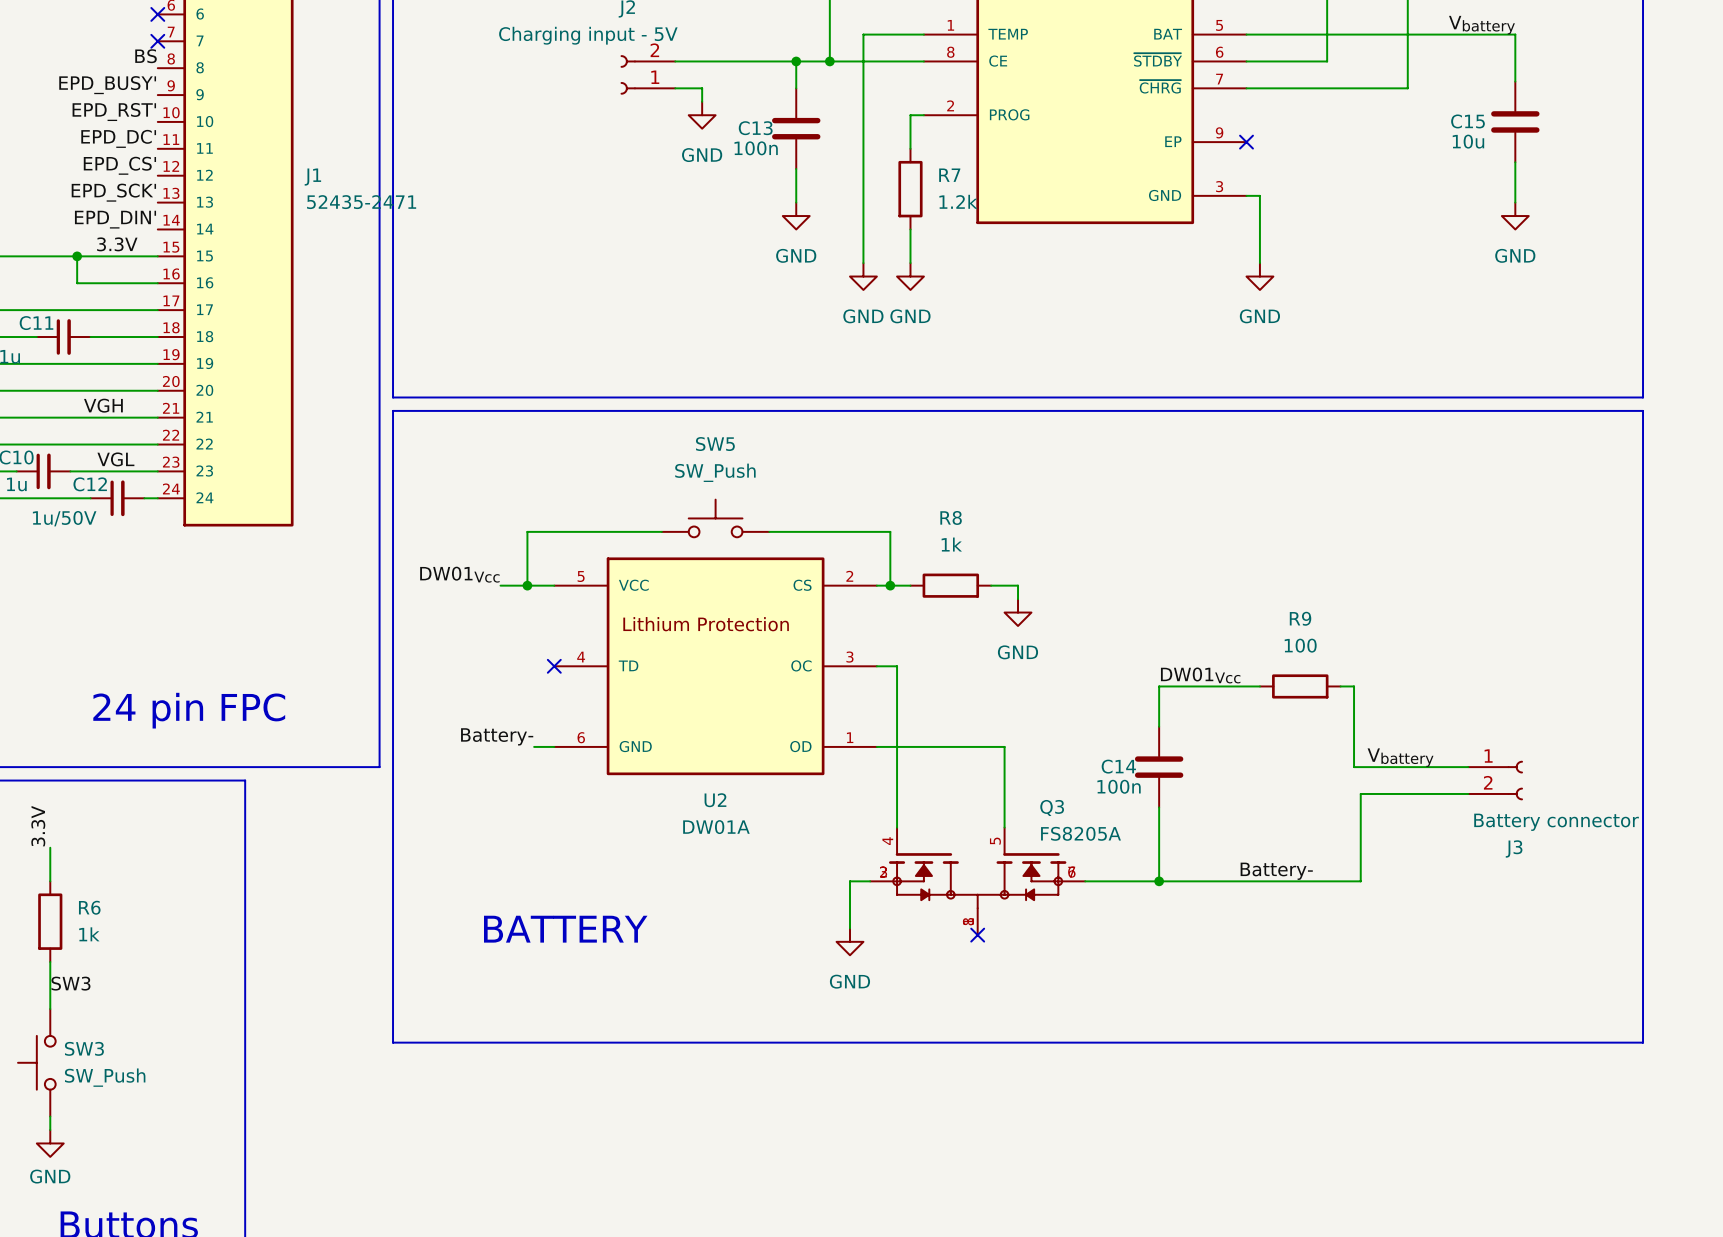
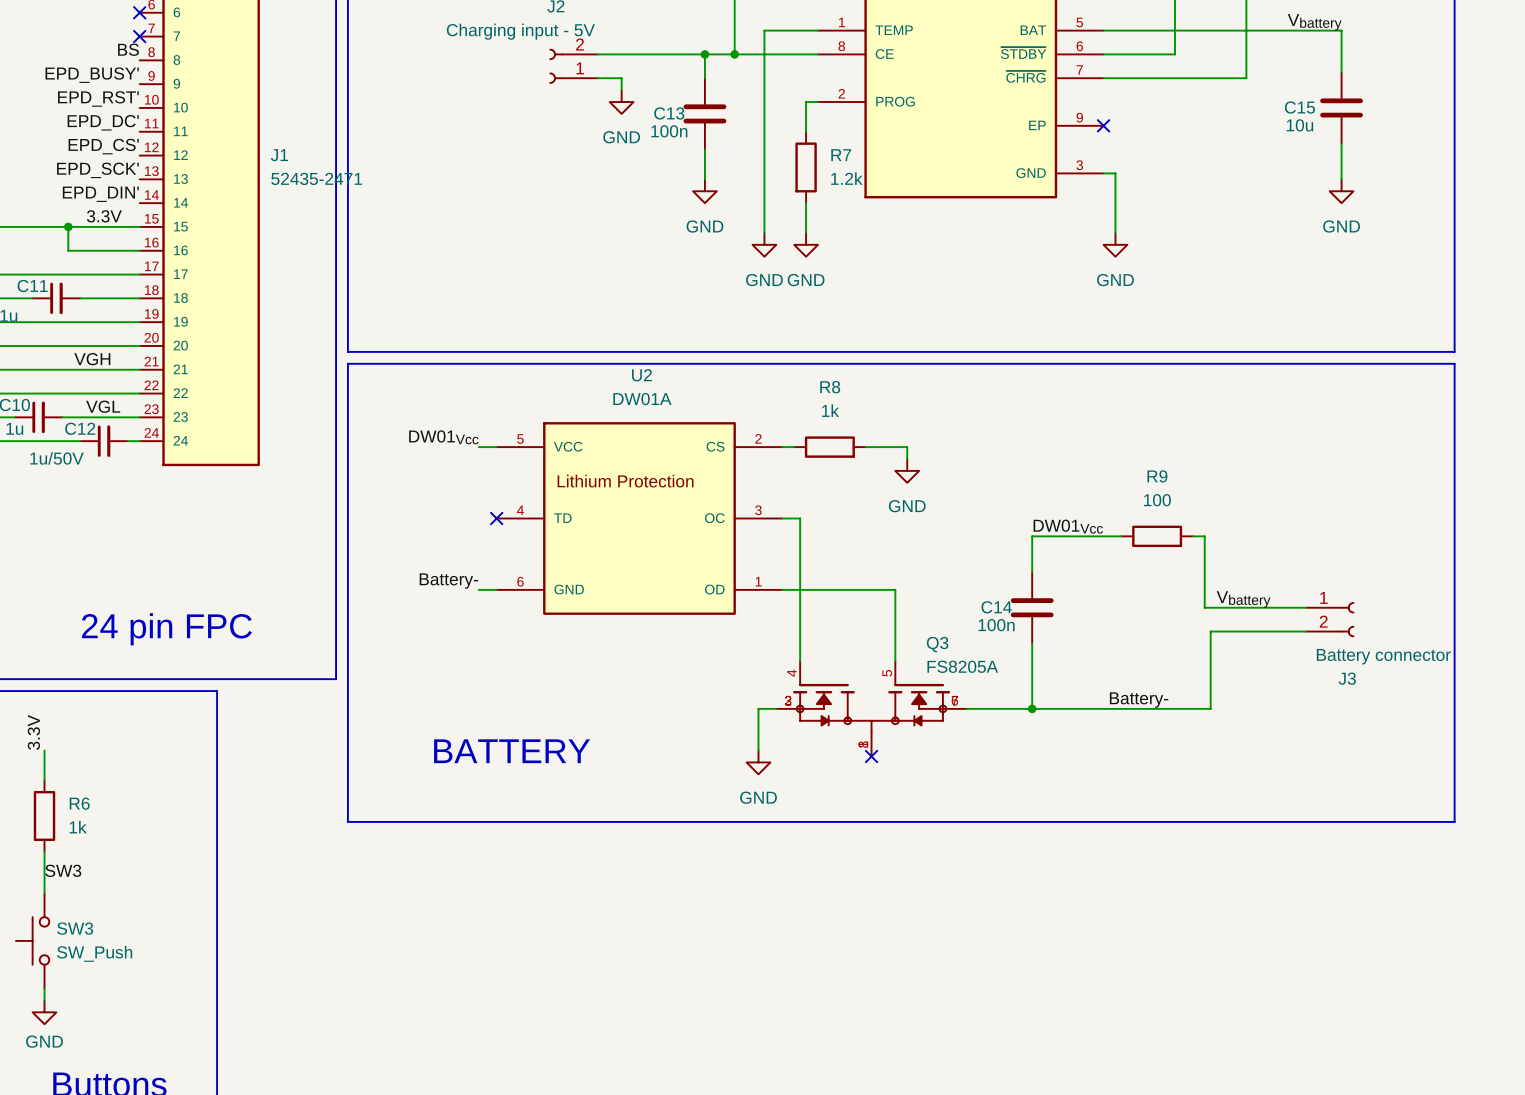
wire: none -> (478, 447) (496, 447)
wire: none -> (782, 447) (794, 447)
wire: none -> (865, 447) (907, 447) (907, 459)
SW5: SW_Push (715, 518) -> none
wire: (661, 531) (527, 531) (527, 585) -> none
wire: (769, 531) (890, 531) (890, 585) -> none
label position: DW01Vcc (459, 574) -> DW01Vcc (443, 437)
wire: (500, 585) (554, 585) -> none
junction: (527, 585) -> none
no-connect mark: none -> (496, 518)
junction: (890, 585) -> none
wire: (903, 585) (910, 585) -> (800, 518) (800, 661)
R8 position: (950, 585) -> (829, 447)
wire: (991, 585) (1018, 585) (1018, 599) -> none
power symbol position: GND (1018, 612) -> GND (907, 470)
no-connect mark: (554, 666) -> none
U2 position: (715, 666) -> (639, 518)
wire: (897, 666) (897, 827) -> (794, 589) (895, 589) (895, 661)
label position: DW01Vcc (1200, 675) -> DW01Vcc (1068, 526)
wire: (1259, 686) (1159, 686) (1159, 726) -> (1121, 536) (1032, 536) (1032, 572)
R9 position: (1300, 686) -> (1157, 536)
wire: (1340, 686) (1354, 686) (1354, 767) (1468, 767) -> (1192, 536) (1204, 536) (1204, 607) (1305, 607)
label position: Battery- (497, 736) -> Battery- (448, 581)
wire: (534, 746) (554, 746) -> (478, 589) (496, 589)
wire: (876, 746) (1004, 746) (1004, 827) -> none
label position: Vbattery (1400, 757) -> Vbattery (1243, 599)
C14 position: (1159, 767) -> (1032, 607)
J3 position: (1495, 780) -> (1330, 619)
wire: (1468, 793) (1360, 793) (1360, 881) (1085, 881) -> (1305, 631) (1210, 631) (1210, 708) (966, 708)
U2 name position: U2 (715, 800) -> U2 (641, 375)
junction: none -> (1032, 708)
wire: (1159, 807) (1159, 881) -> (1032, 643) (1032, 708)
U2 value position: DW01A (716, 827) -> DW01A (642, 399)
no-connect mark: none -> (871, 756)
label position: Battery- (1276, 871) -> Battery- (1139, 700)
wire: (870, 881) (850, 881) (850, 928) -> (776, 708) (758, 708) (758, 750)
Q3 position: (977, 881) -> (871, 708)
junction: (1159, 881) -> none
line: (393, 928) (393, 1042) (1643, 1042) (1643, 928) -> (347, 821) (1454, 821)
text position: BATTERY (565, 929) -> BATTERY (512, 751)
no-connect mark: (977, 935) -> none
power symbol position: GND (850, 941) -> GND (758, 762)

